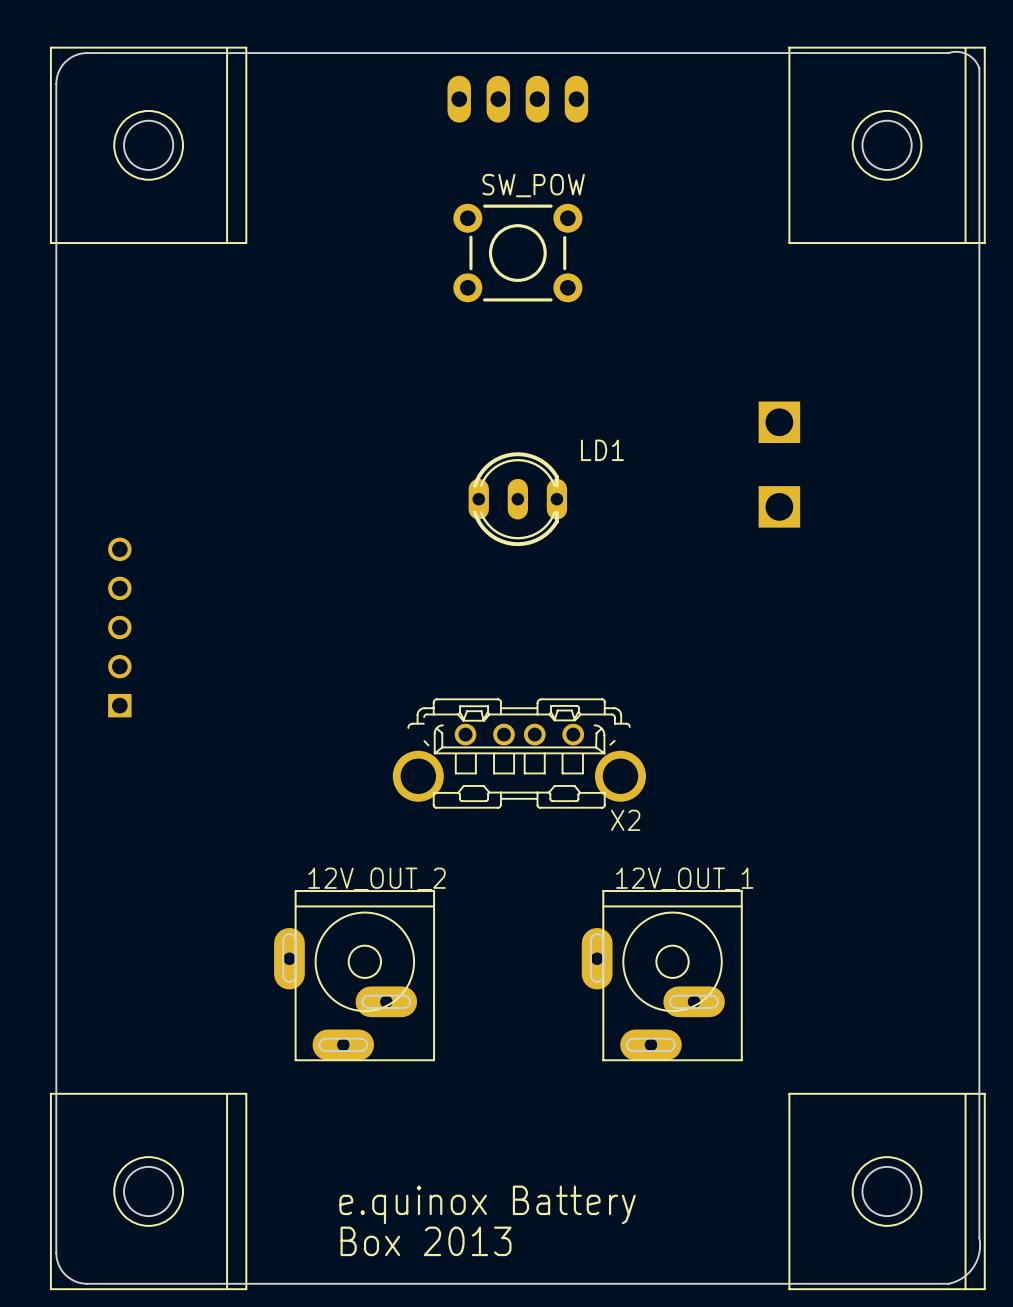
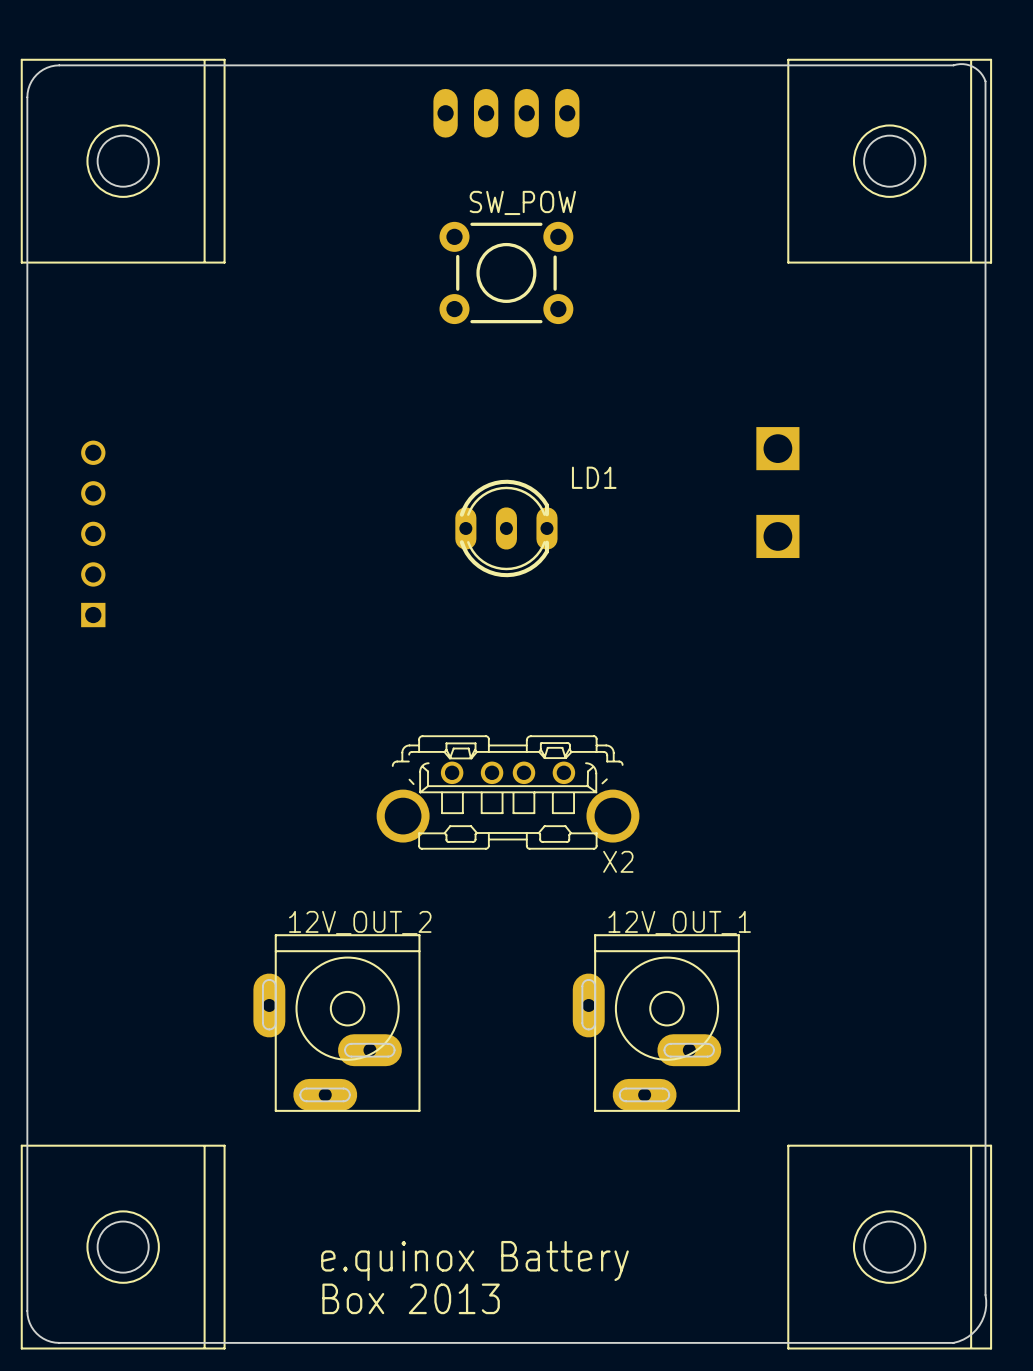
part position: (119, 627) -> (93, 533)

